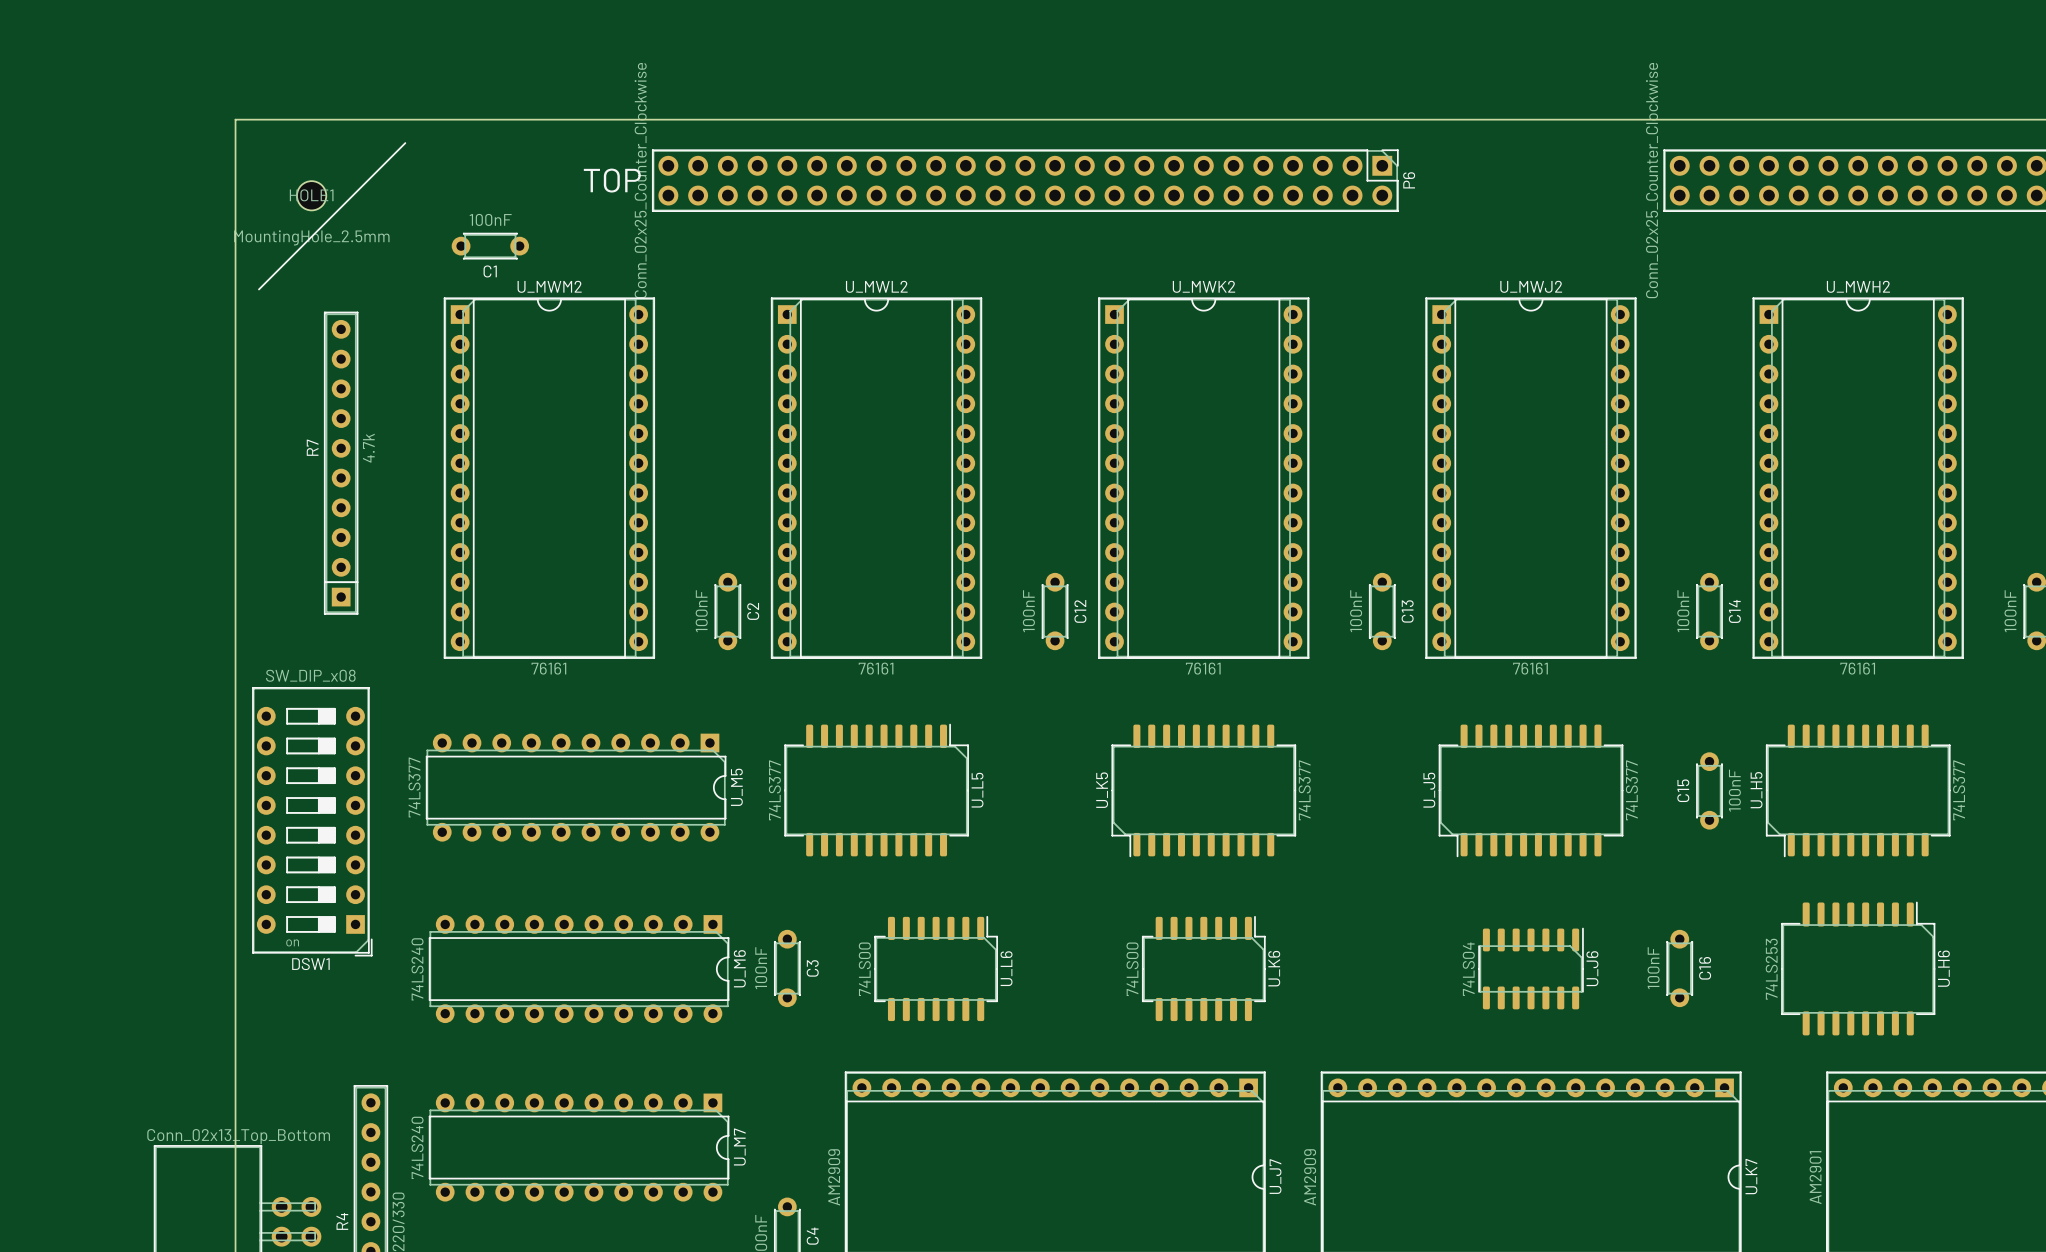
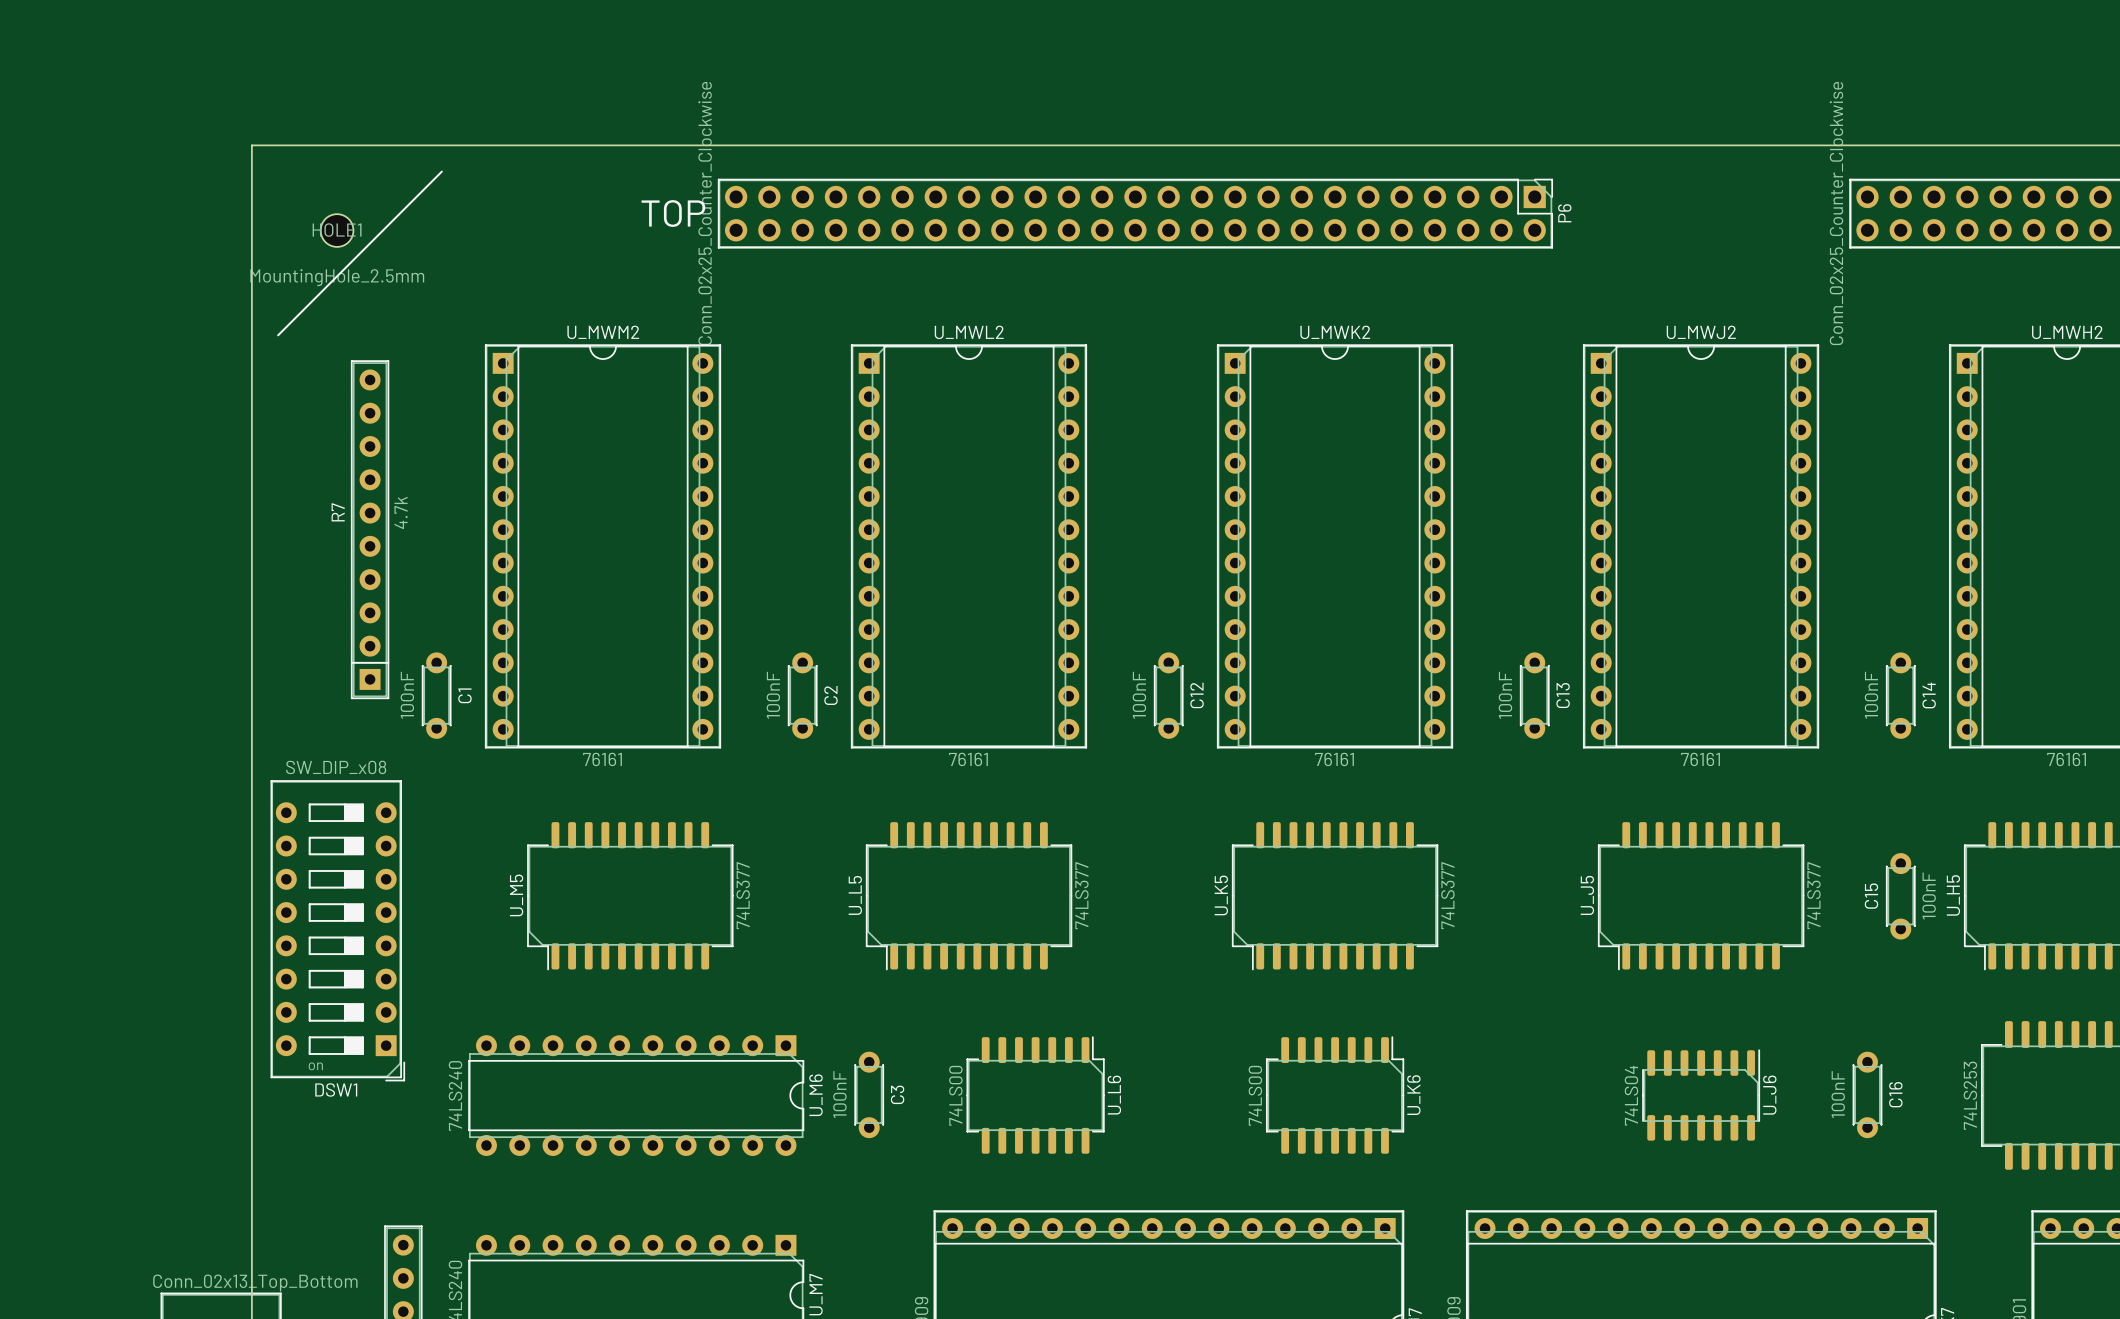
C1 value position: 100nF (490, 219) -> 100nF (407, 695)
C1 rotation: 0° (490, 246) -> 90° clockwise (436, 695)
C1 position: (490, 246) -> (436, 695)
C1 name position: C1 (490, 271) -> C1 (464, 695)
U_M5 footprint: [425, 733, 727, 842] -> [527, 822, 734, 971]
U_M5 value position: 74LS377 (414, 787) -> 74LS377 (743, 895)
U_M5 name position: U_M5 (736, 787) -> U_M5 (516, 895)
U_L5 rotation: 0° (876, 790) -> 180° (969, 896)

